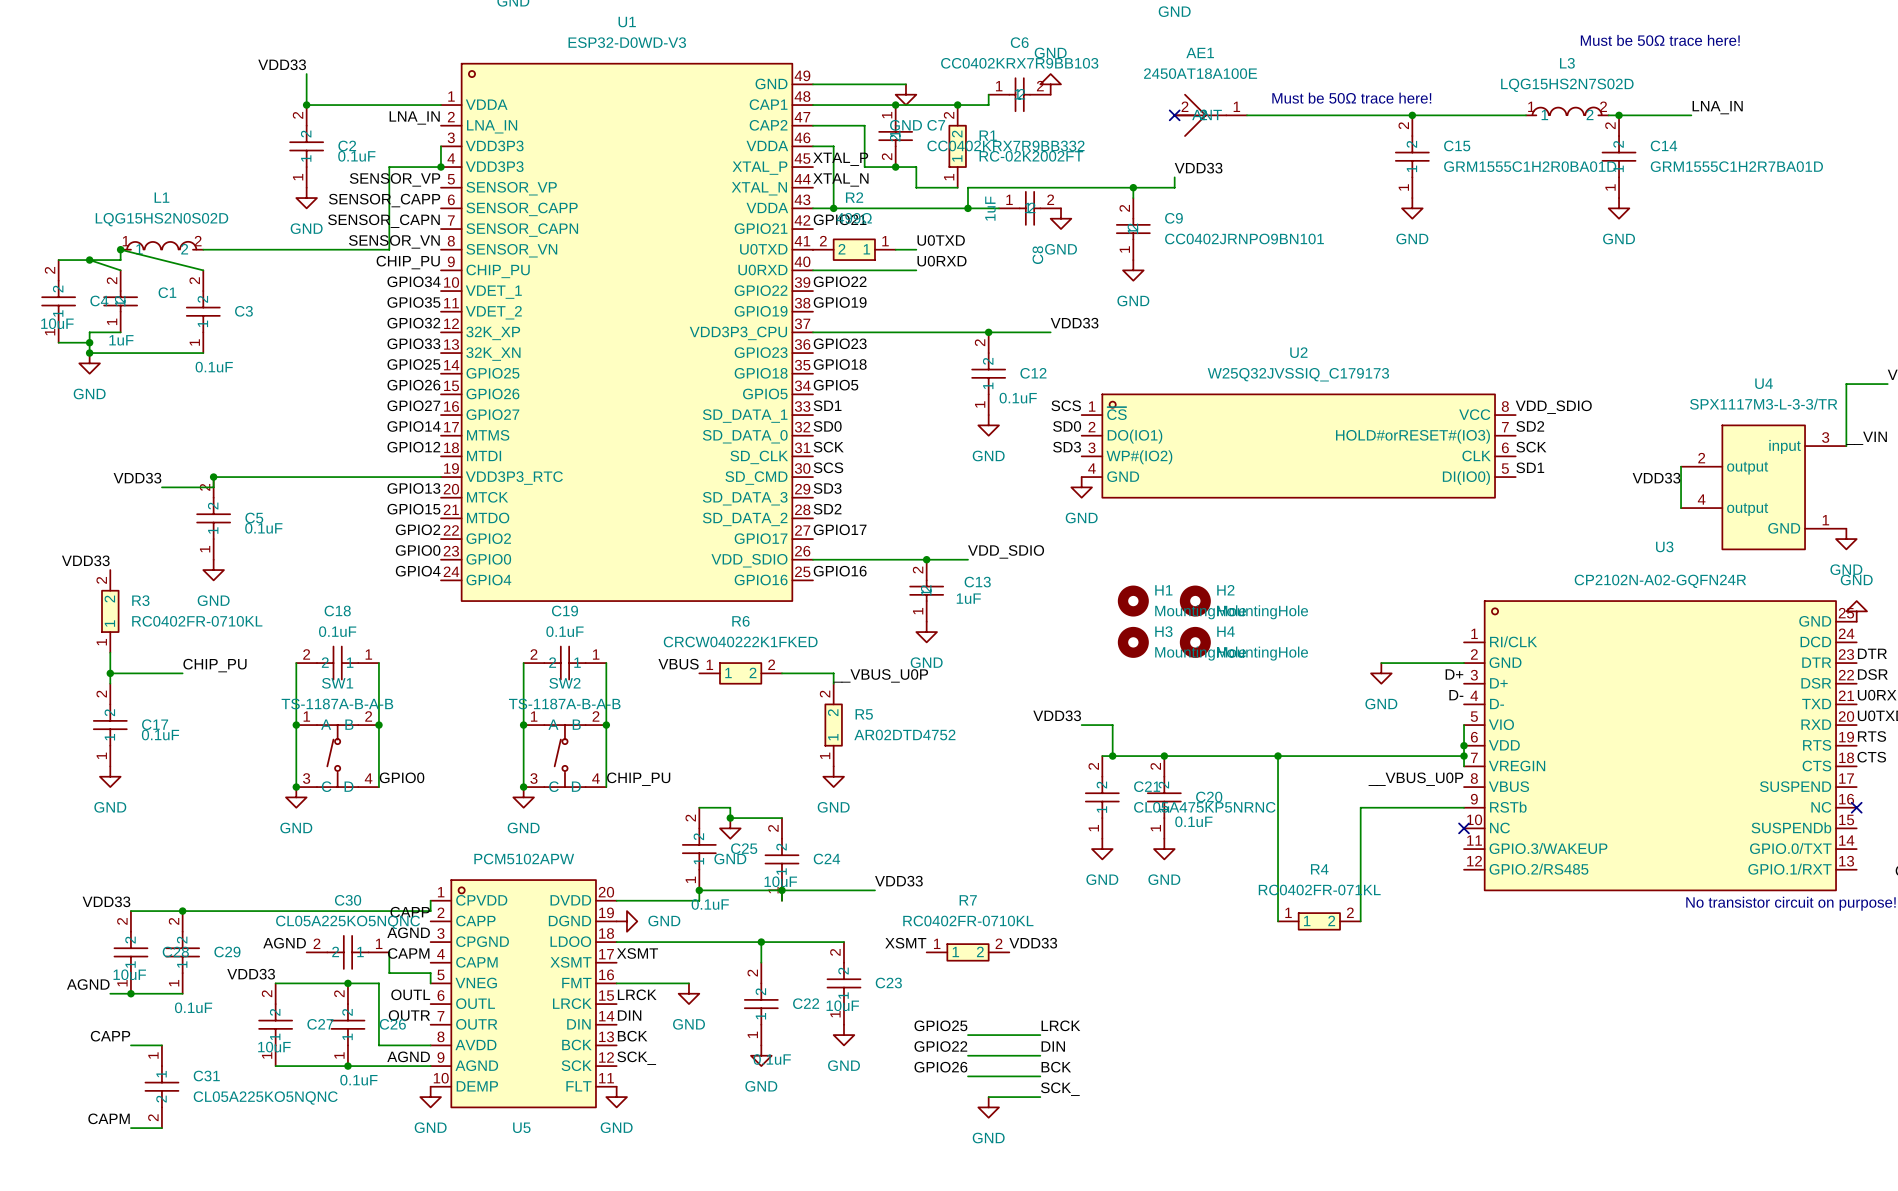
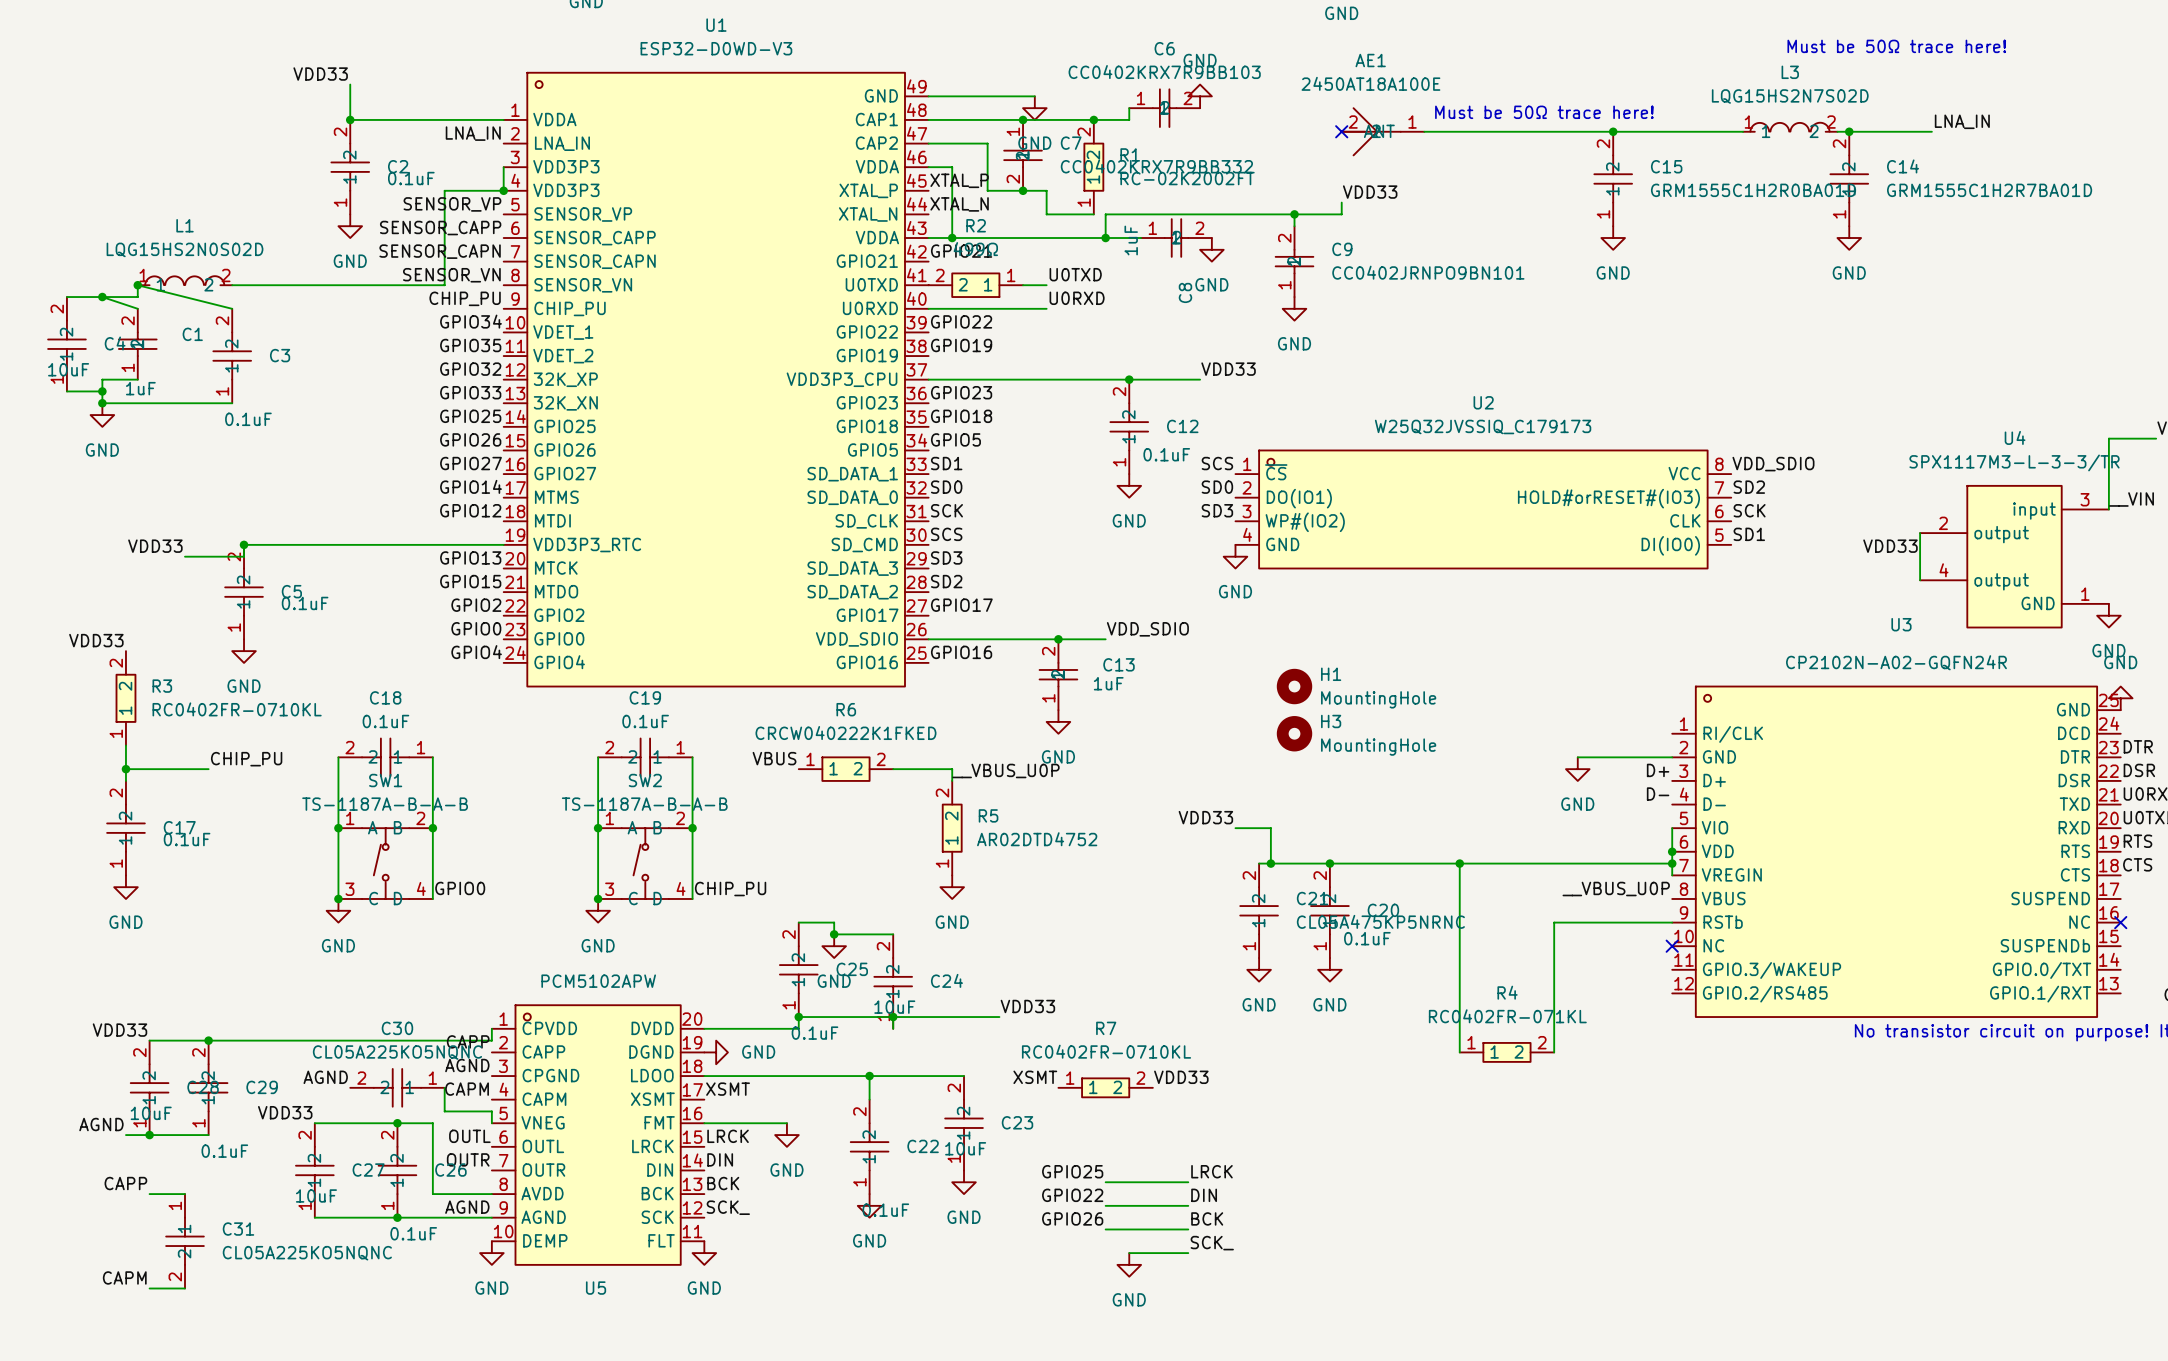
H2: MountingHole (1195, 601) -> none
H4: MountingHole (1195, 642) -> none

